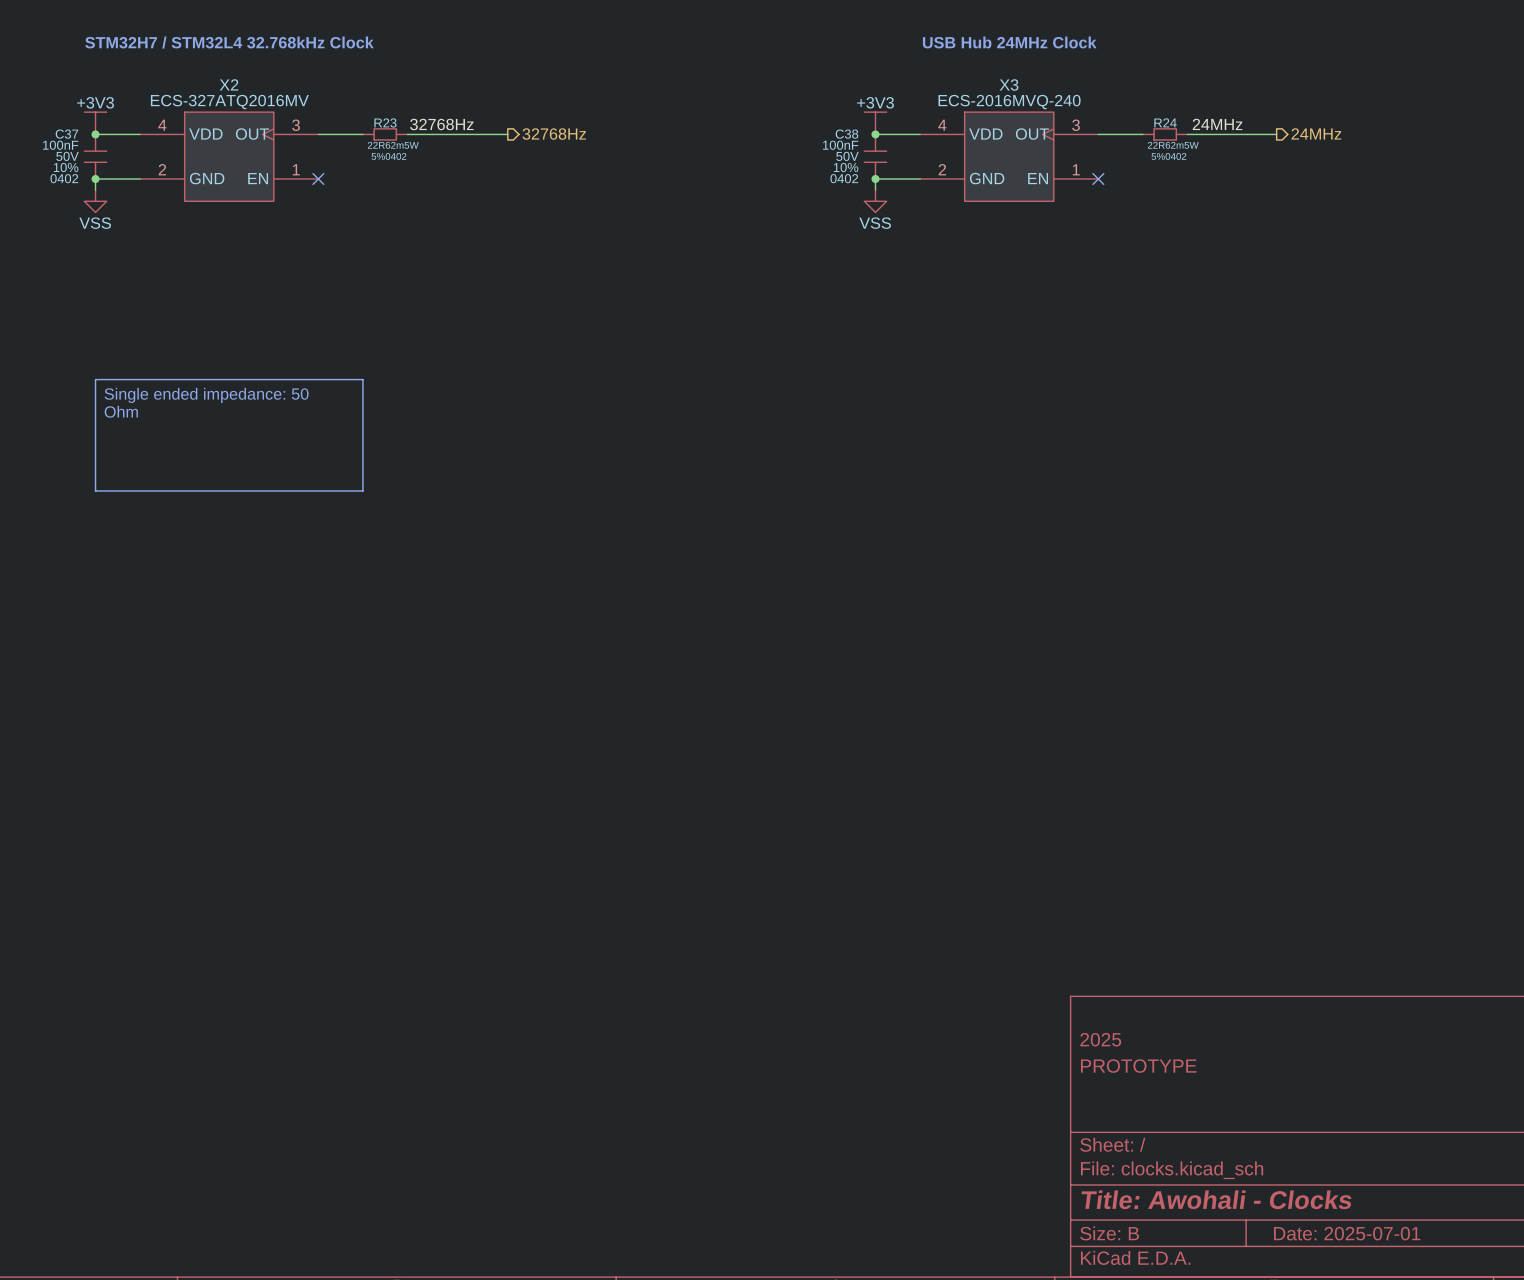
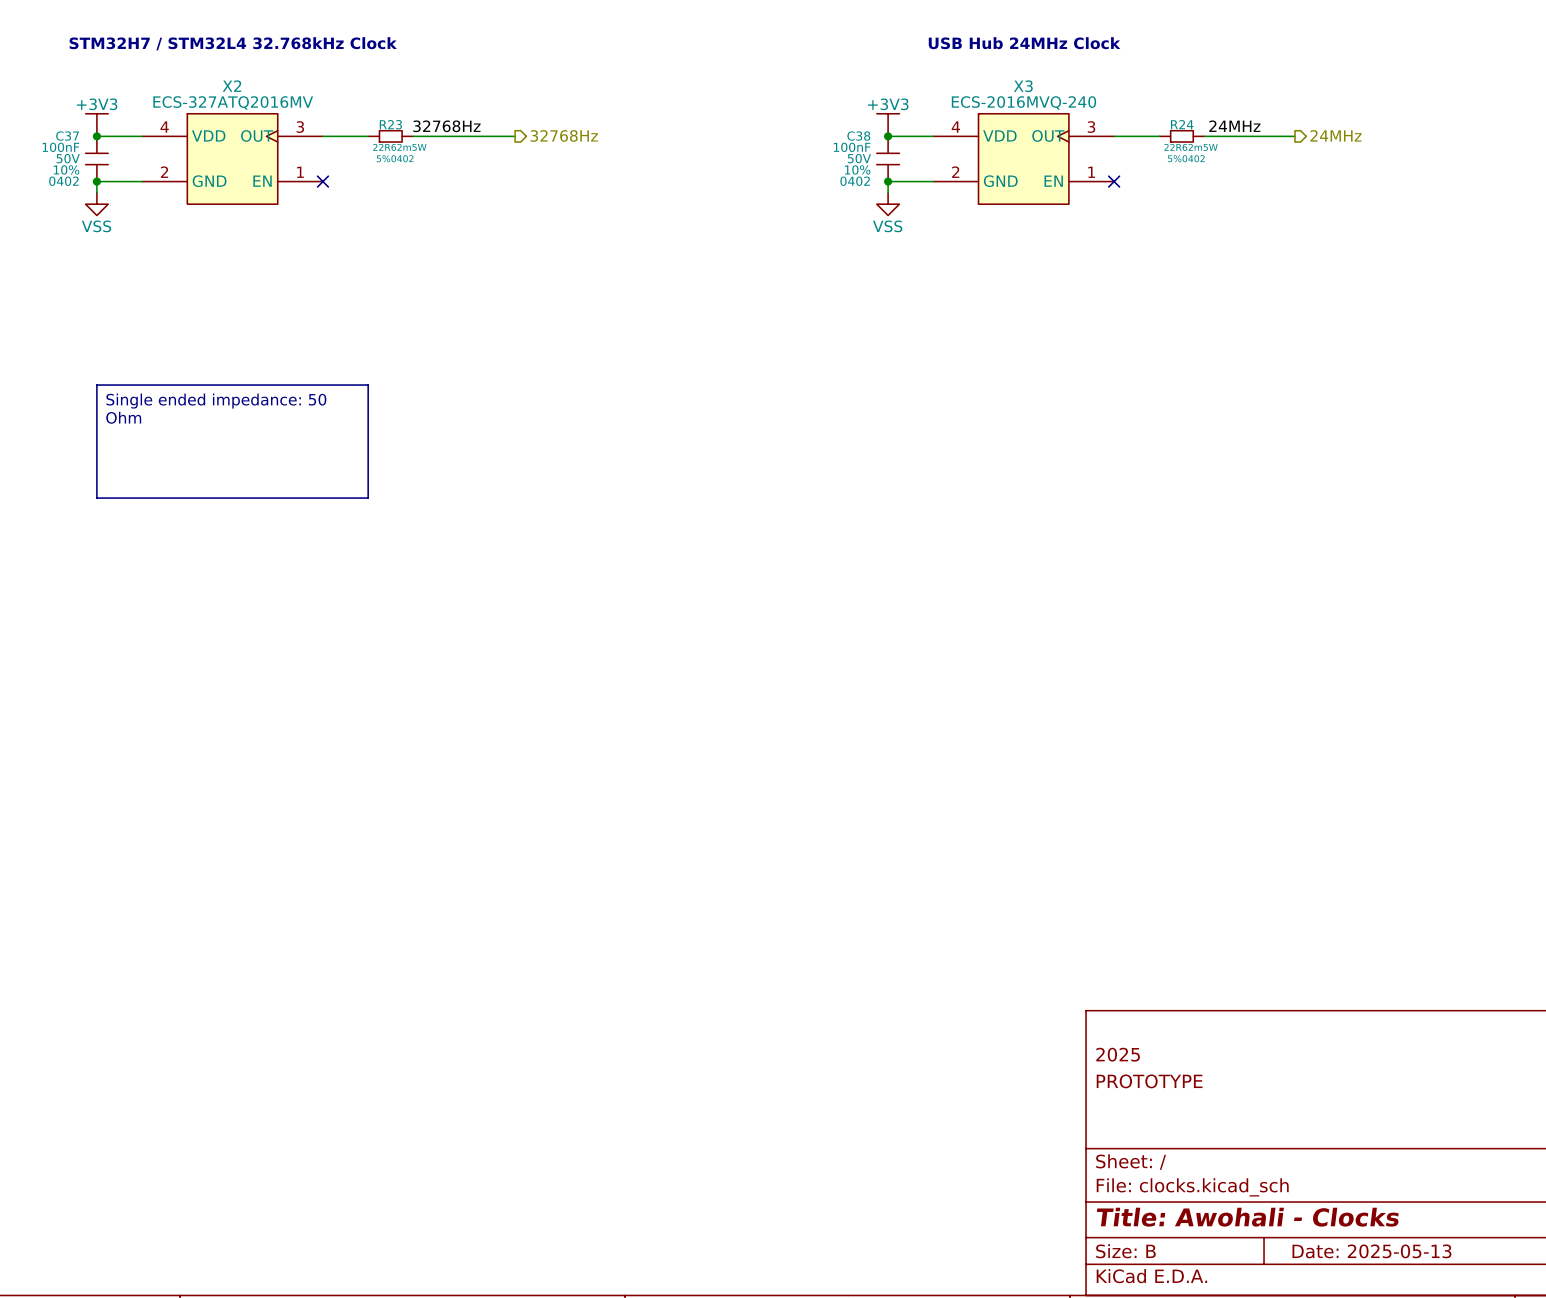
title block: Date: 2025-07-01 (1347, 1233) -> Date: 2025-05-13 (1371, 1251)

